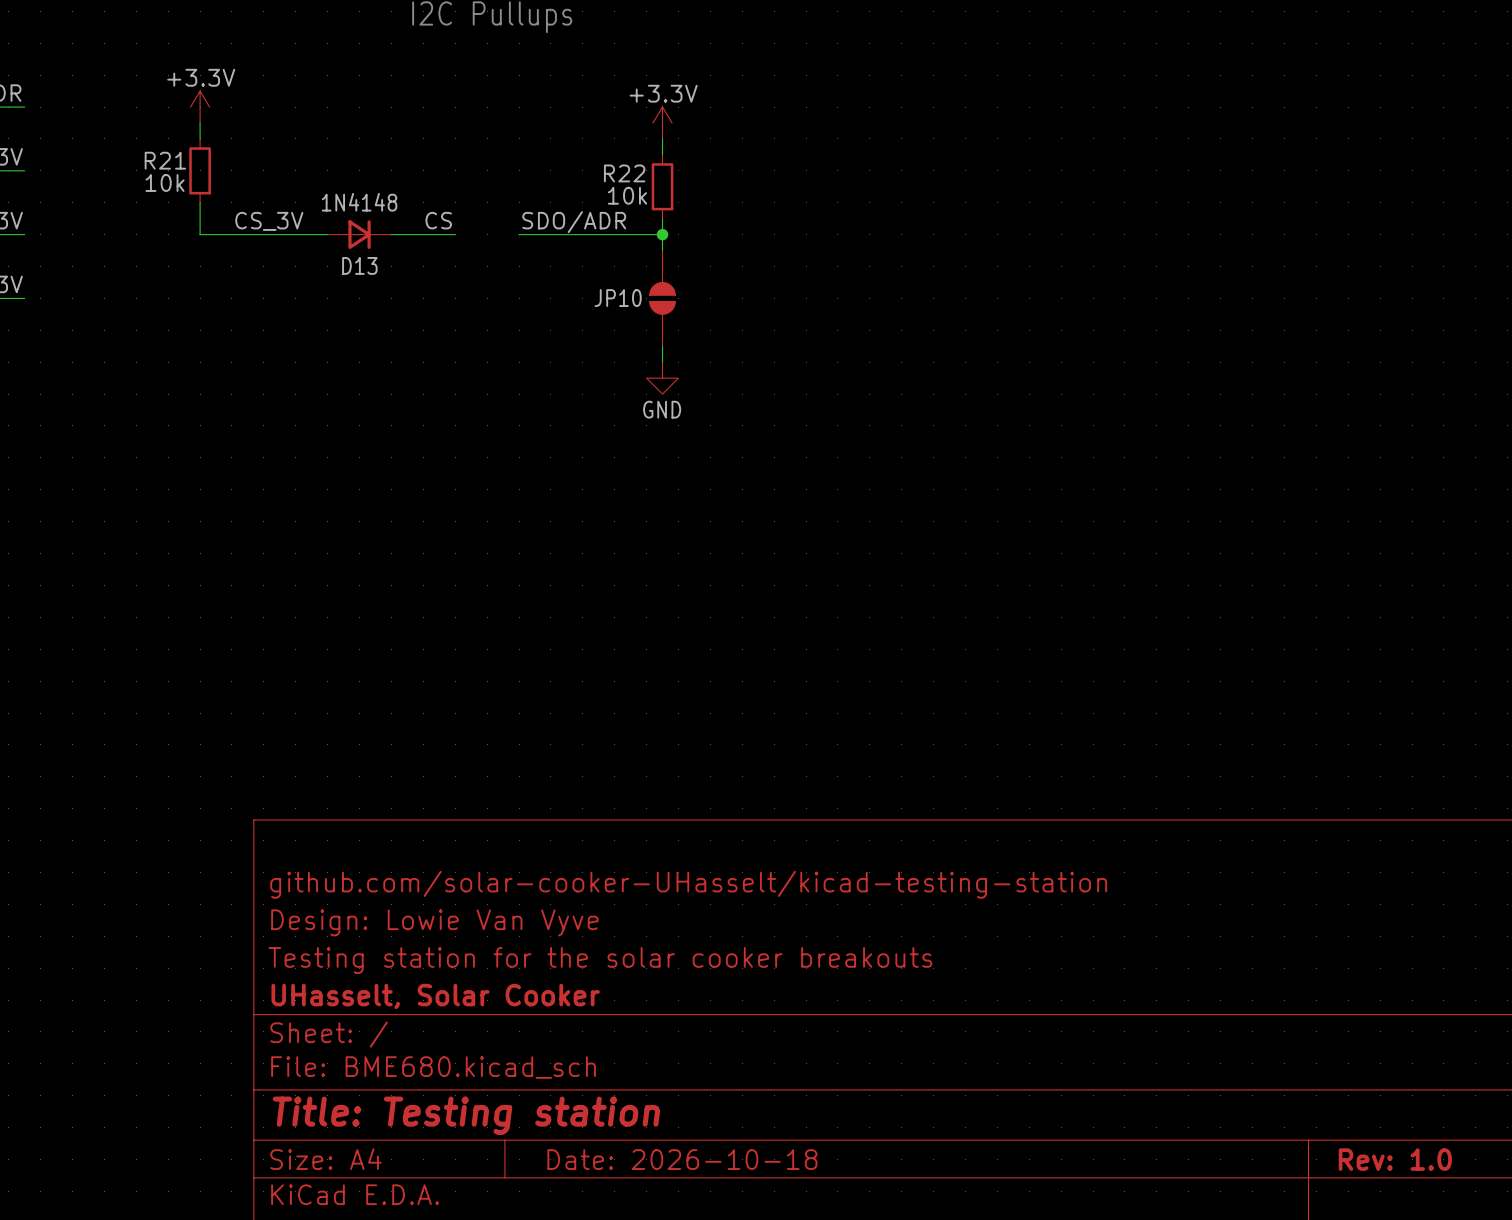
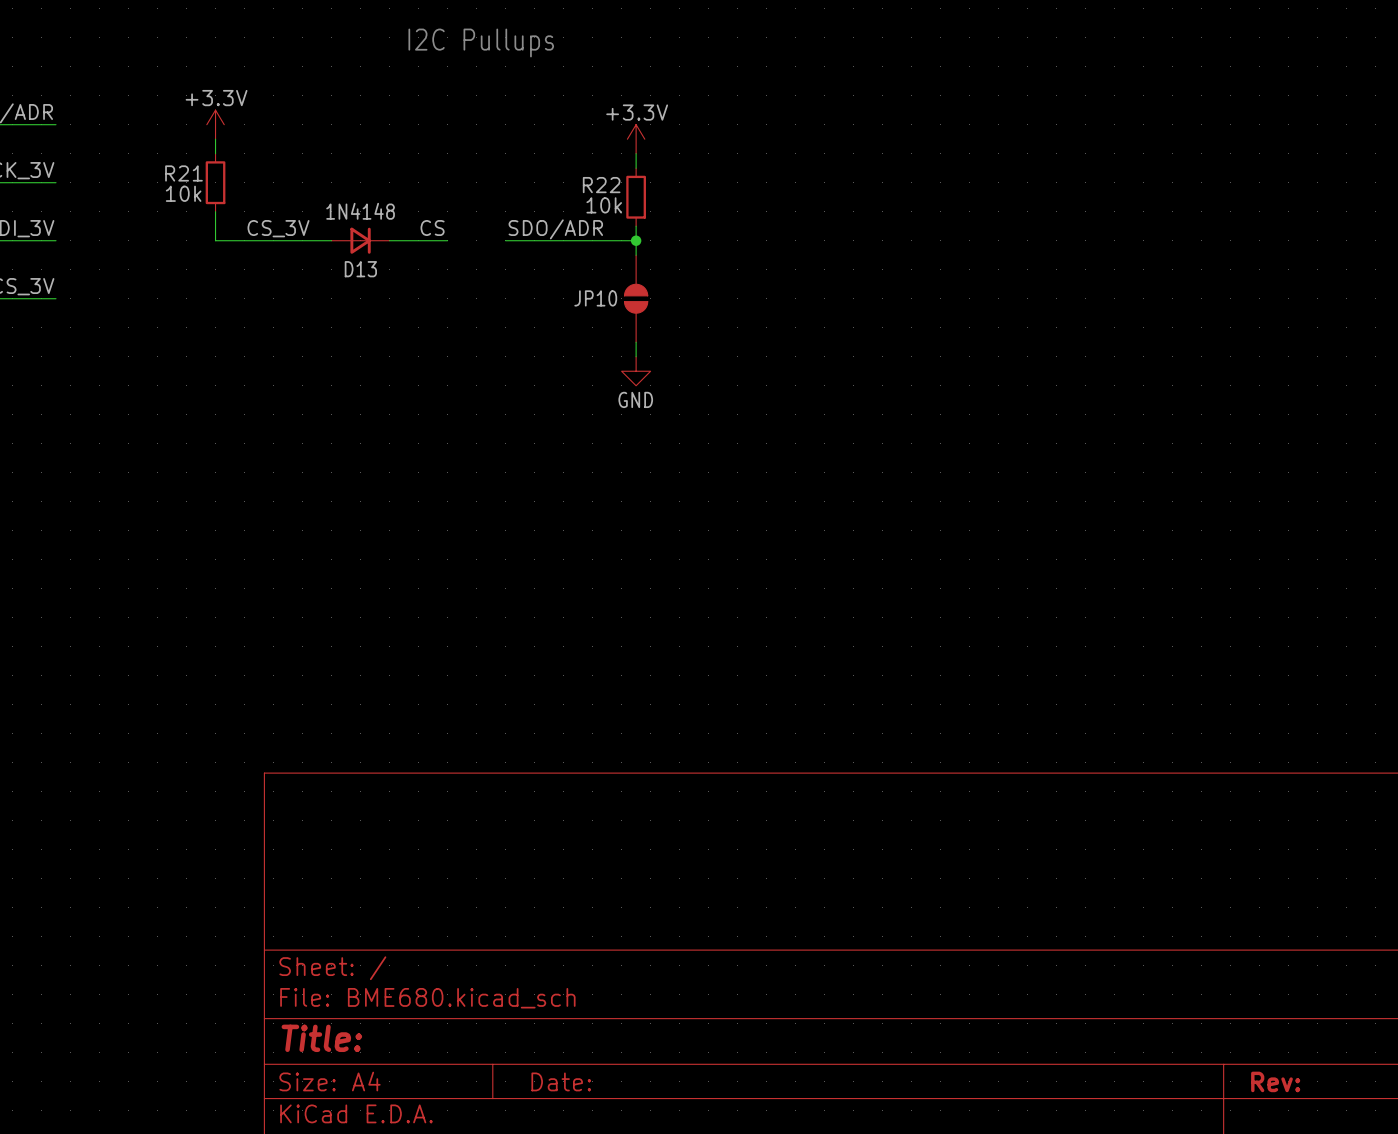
title block: github.com/solar-cooker-UHasselt/kicad-testing-station (688, 884) -> none
title block: Design: Lowie Van Vyve (434, 922) -> none
title block: Testing station for the solar cooker breakouts (600, 960) -> none
title block: UHasselt, Solar Cooker (435, 996) -> none
title block: Title: Testing station (466, 1115) -> Title: (321, 1038)
title block: Date: 2026-10-18 (682, 1159) -> Date: (561, 1081)
title block: Rev: 1.0 (1395, 1159) -> Rev: (1275, 1081)

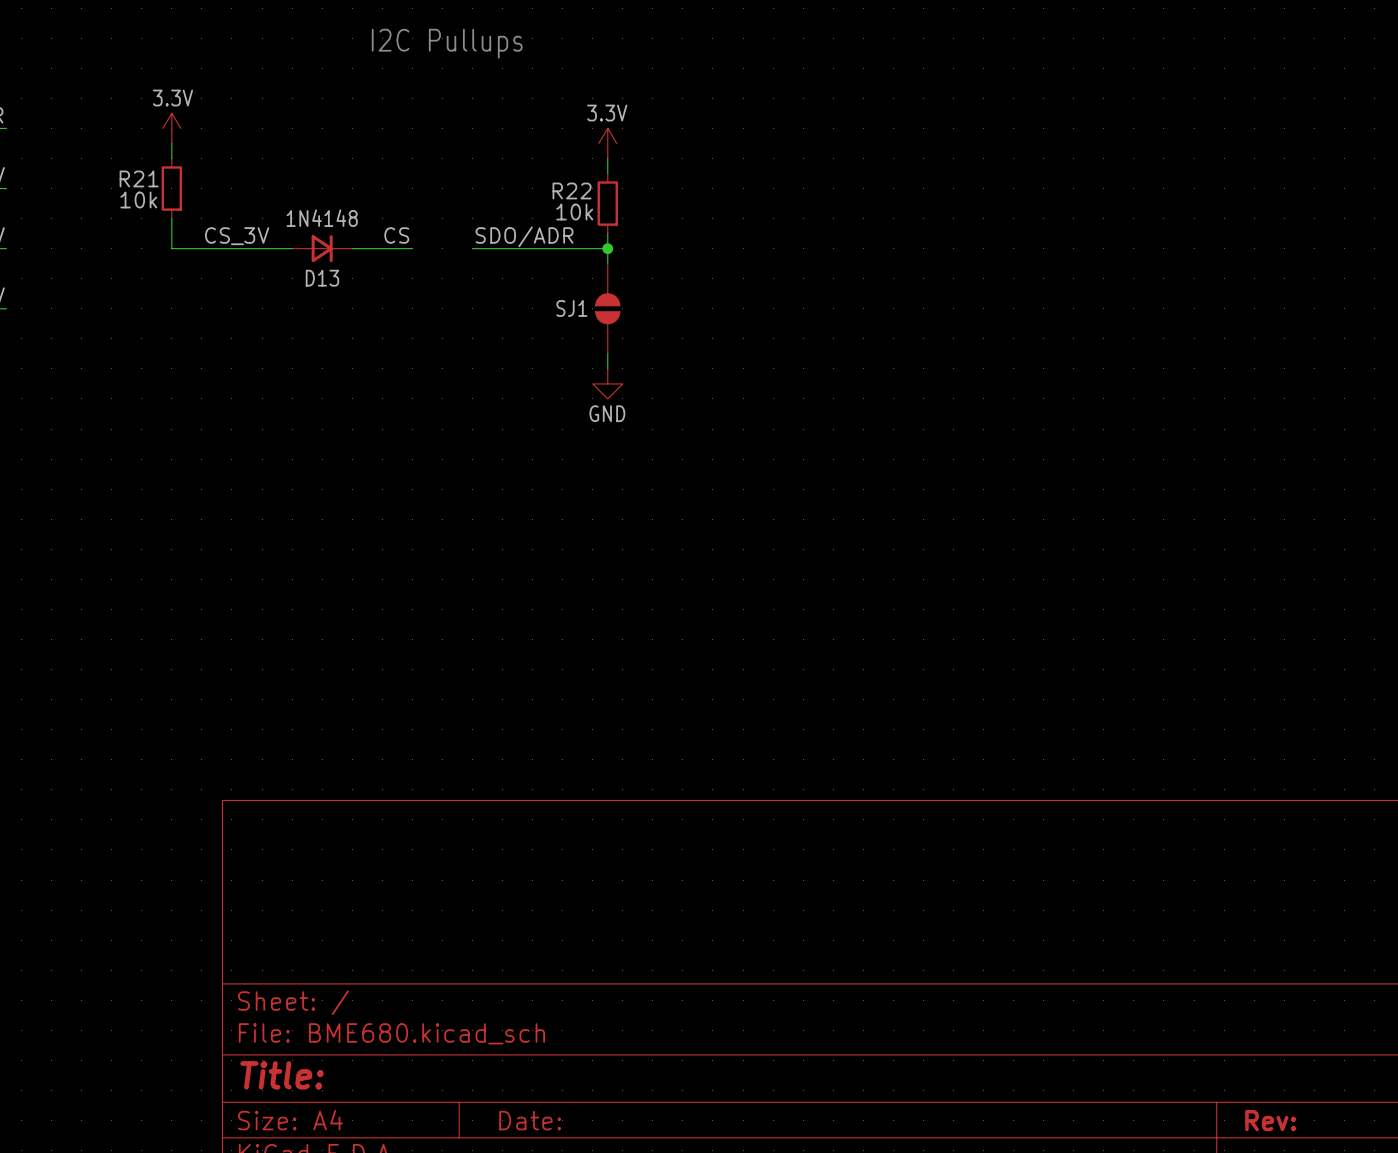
power symbol: +3.3V (215, 124) -> 3.3V (171, 128)
power symbol: +3.3V (636, 139) -> 3.3V (607, 143)
JP10 name: JP10 (595, 298) -> SJ1 (571, 308)

